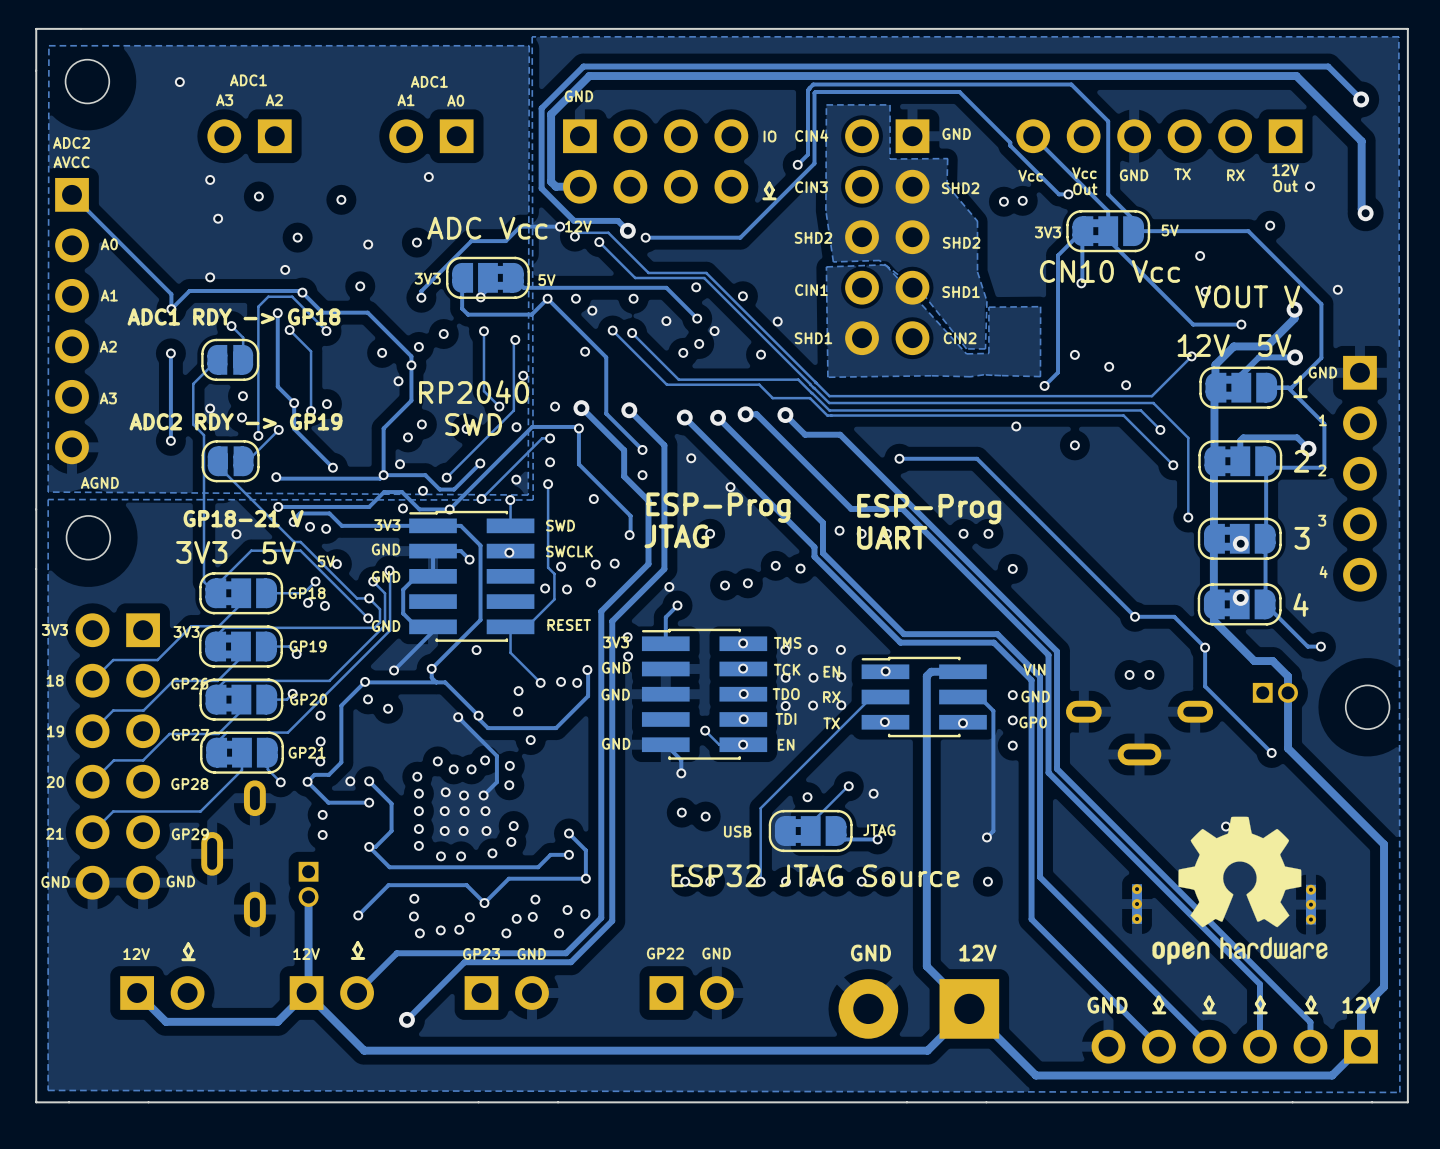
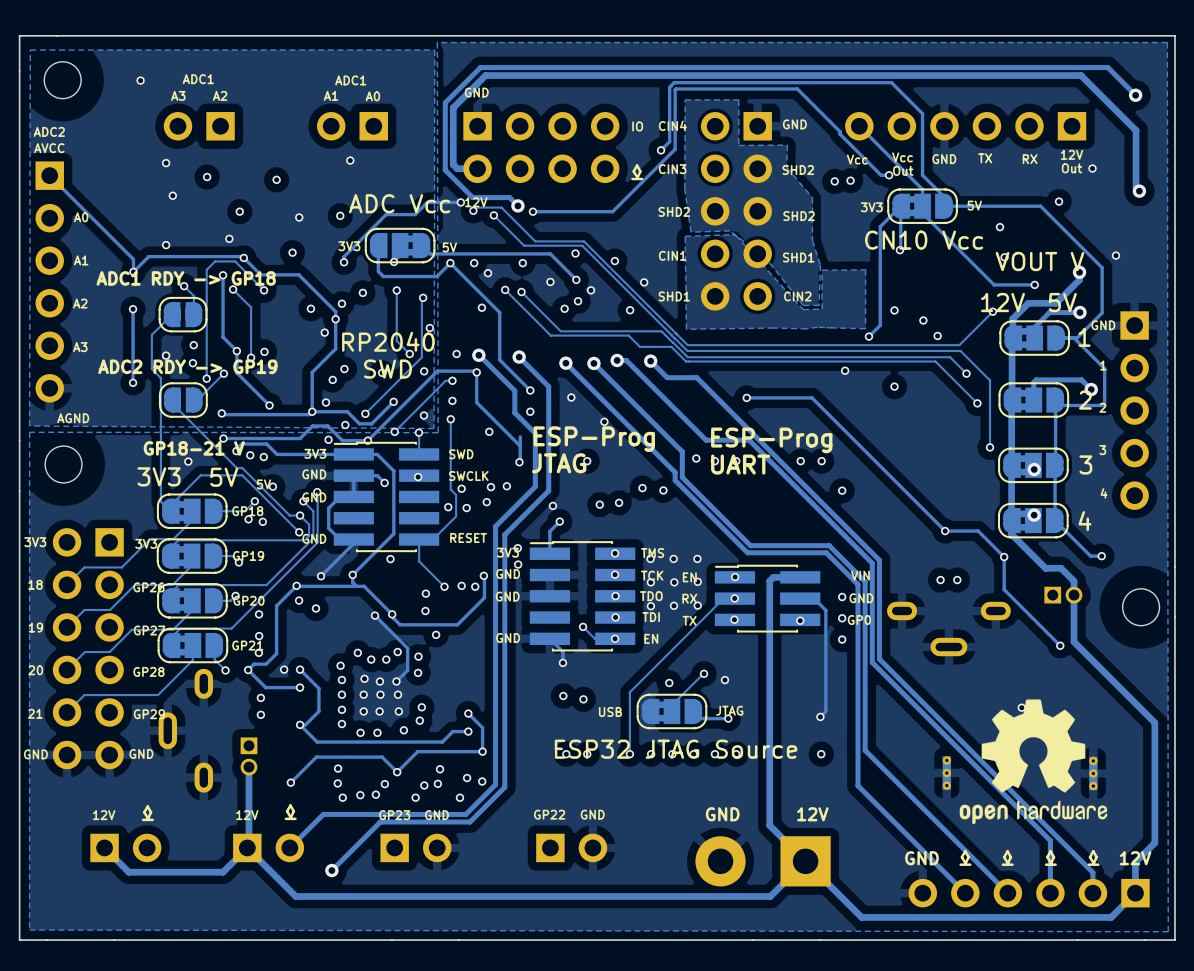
track: none -> (520, 436) (520, 446)
via: none -> (734, 598)

